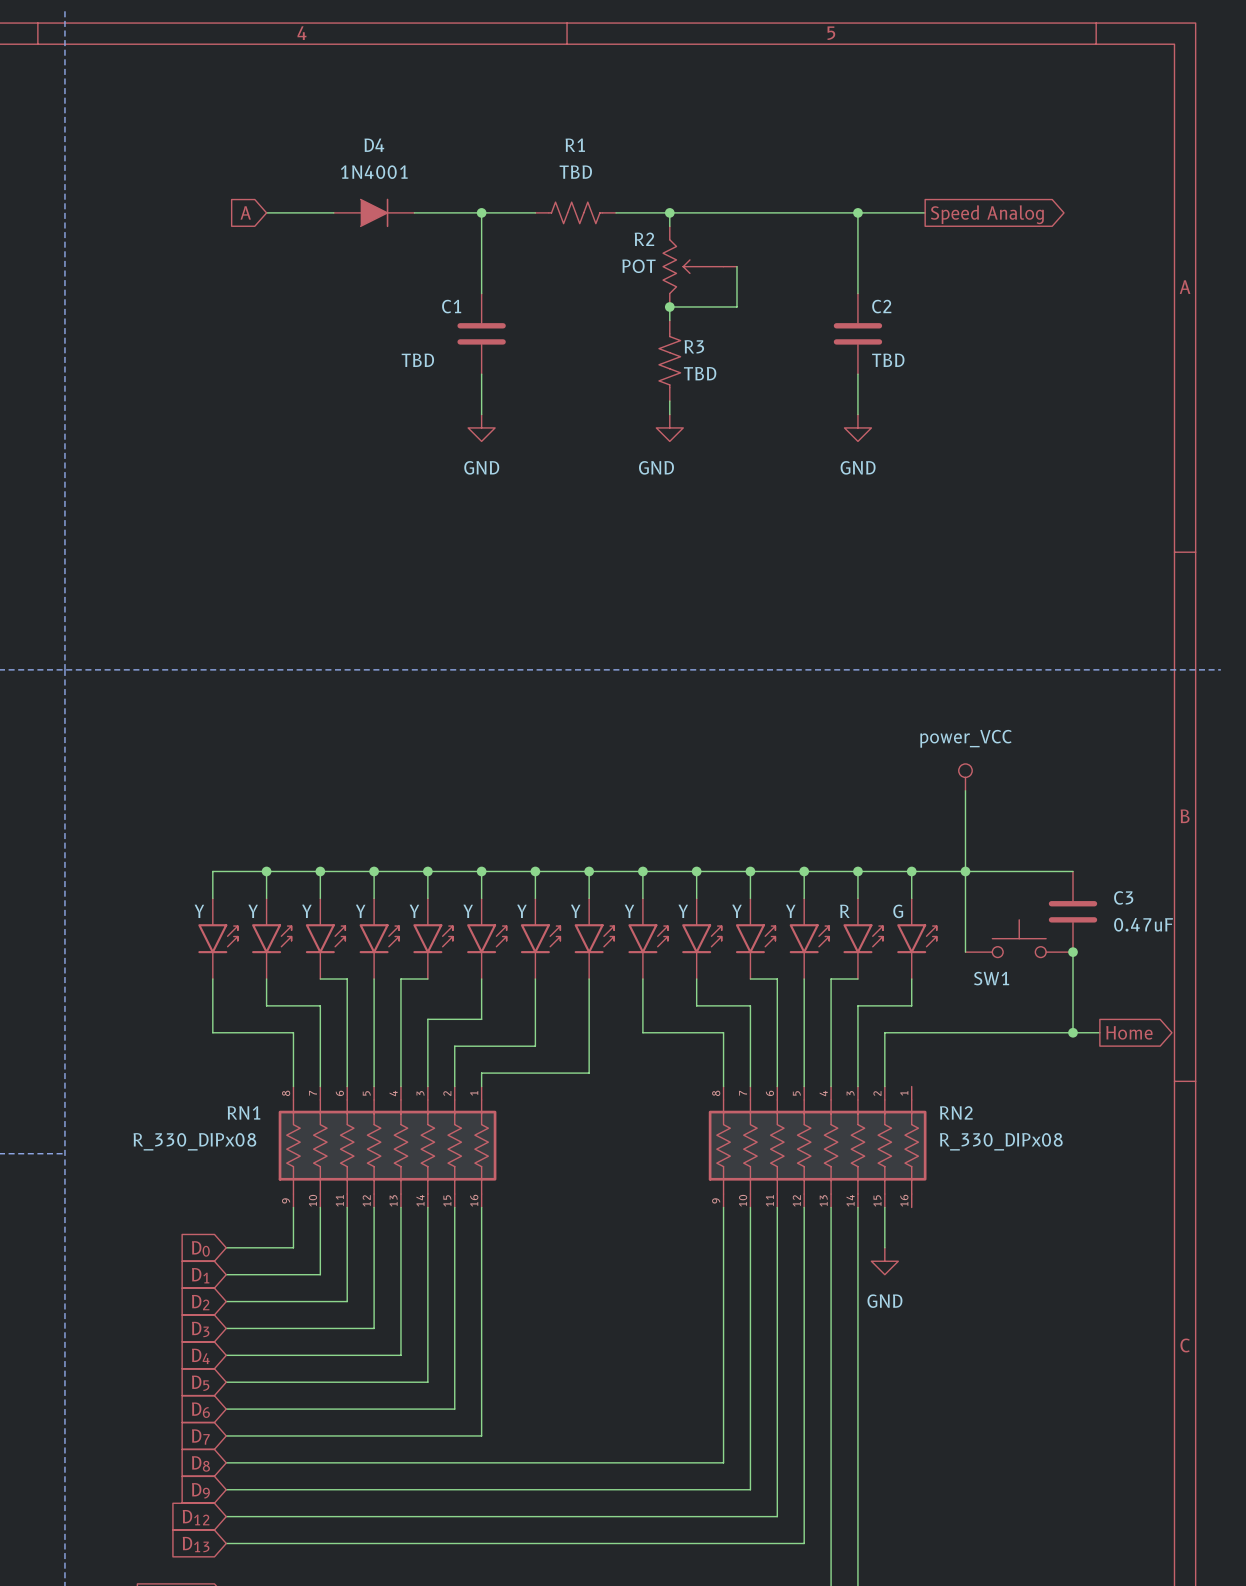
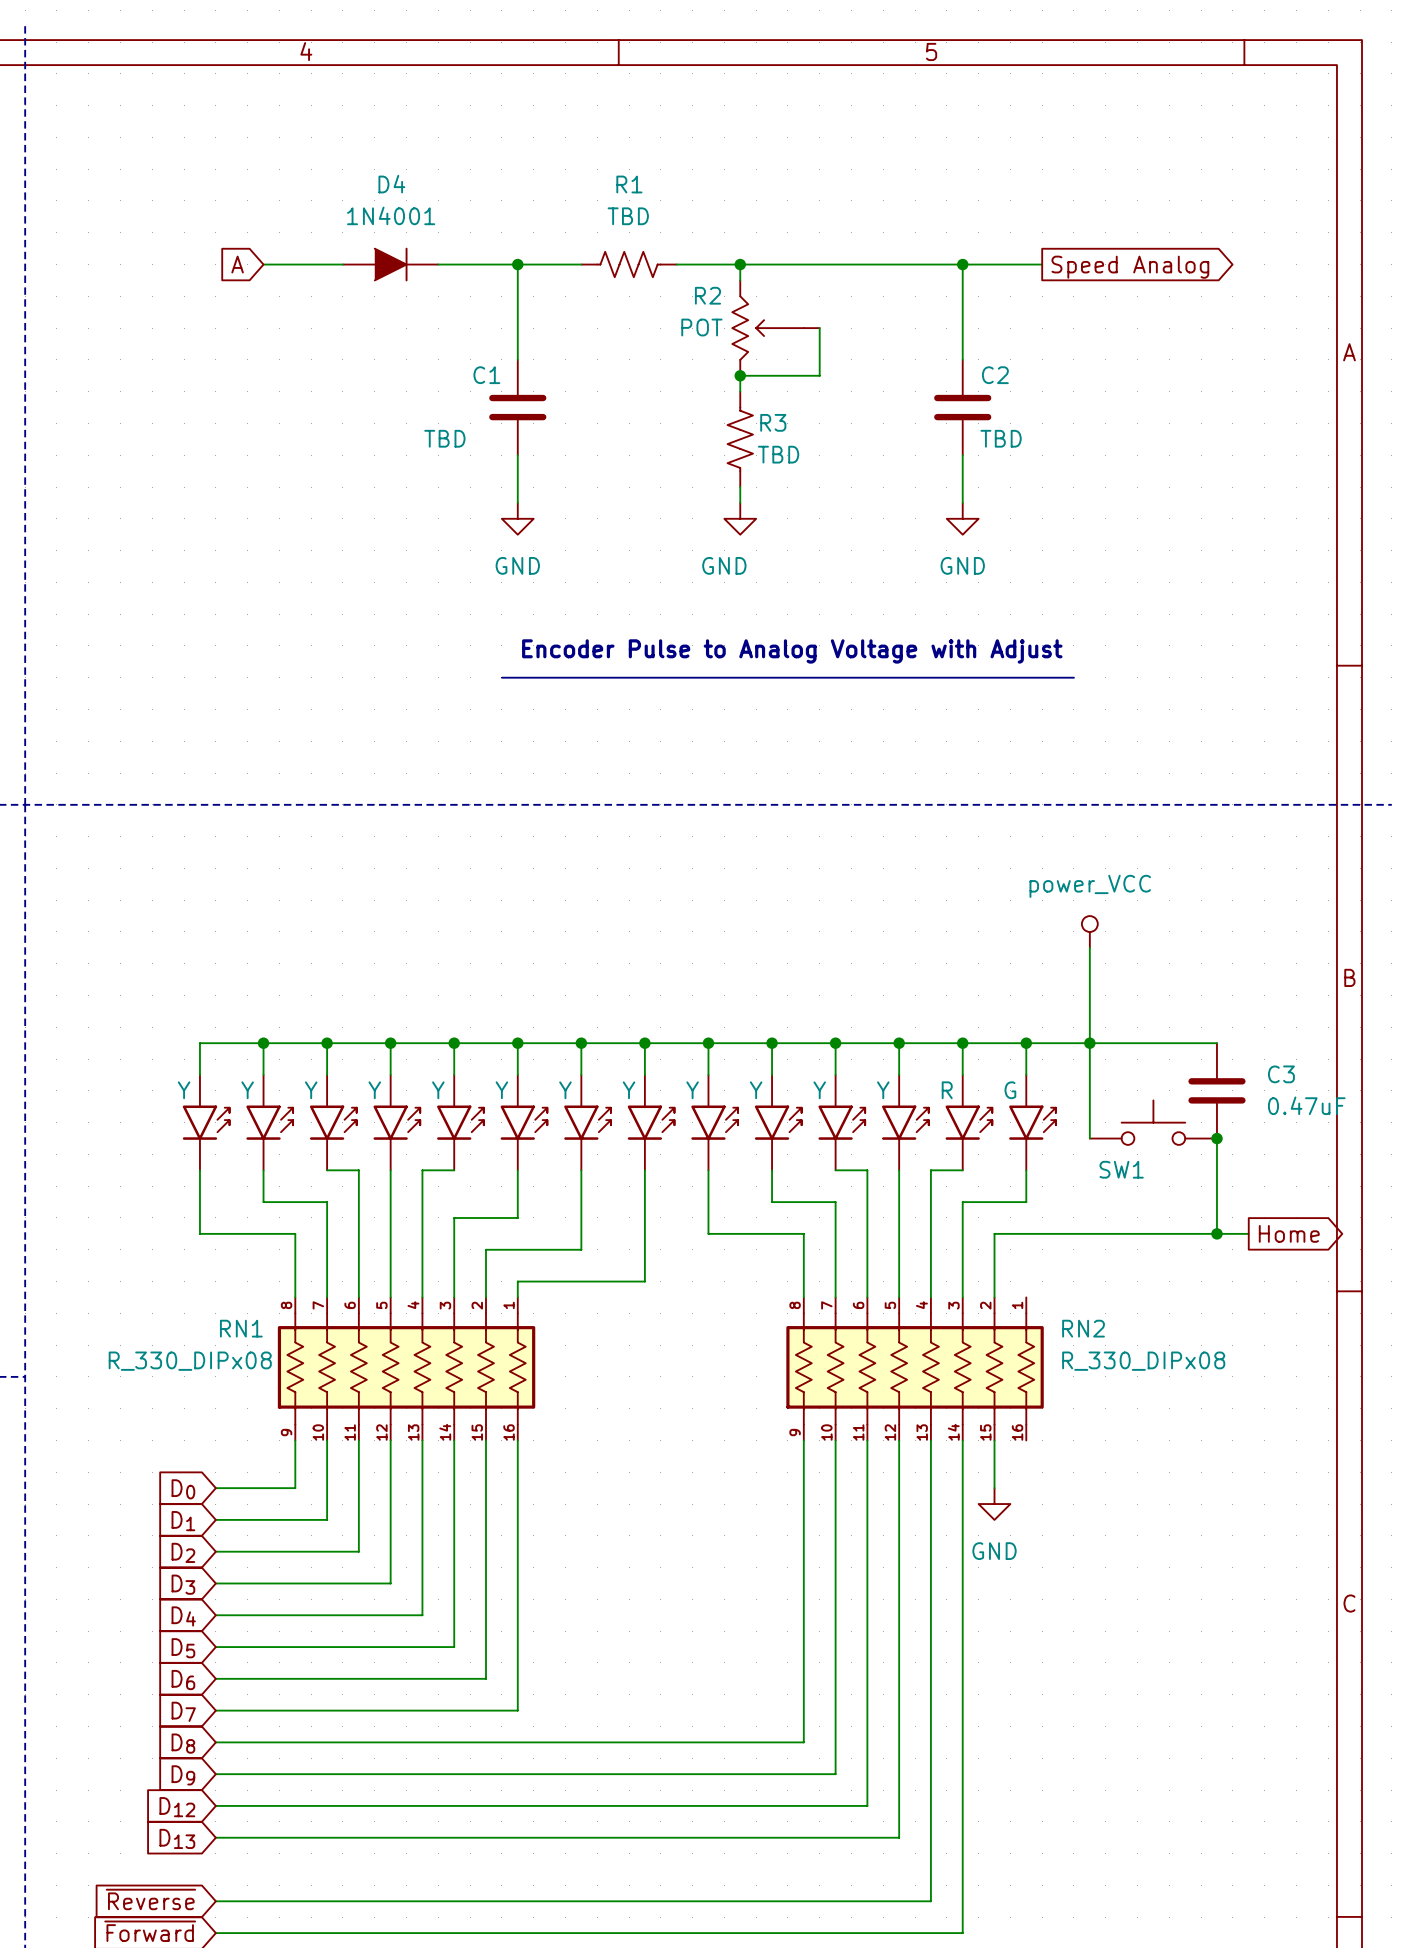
text: none -> Encoder Pulse to Analog Voltage with Adjust (792, 651)
line: none -> (501, 677) (1073, 677)

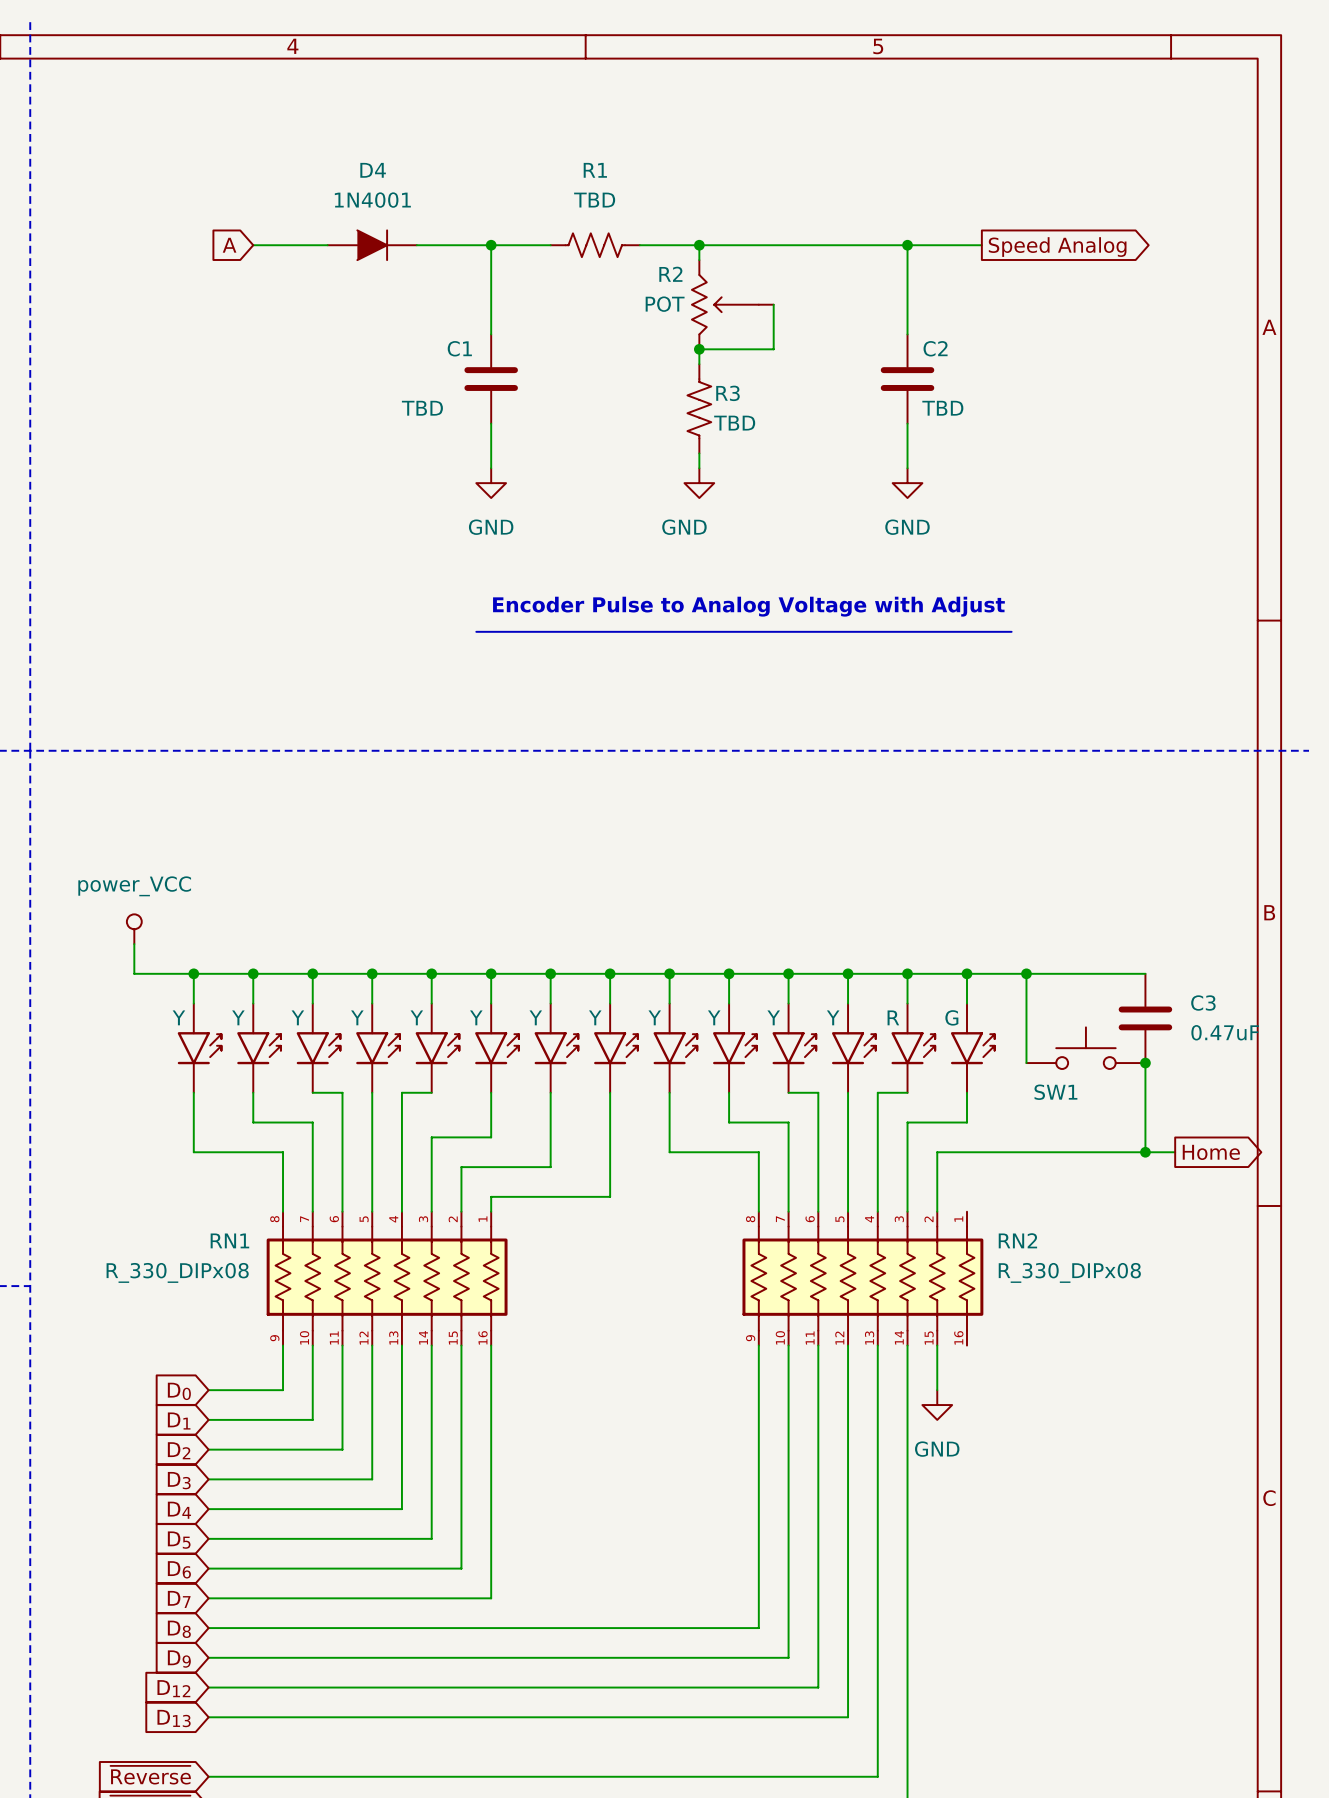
power symbol: power_VCC (1089, 931) -> none
wire: (1089, 947) (1089, 1043) -> none
power symbol: none -> power_VCC (134, 929)
wire: none -> (134, 944) (134, 973) (193, 973)
junction: none -> (193, 973)

